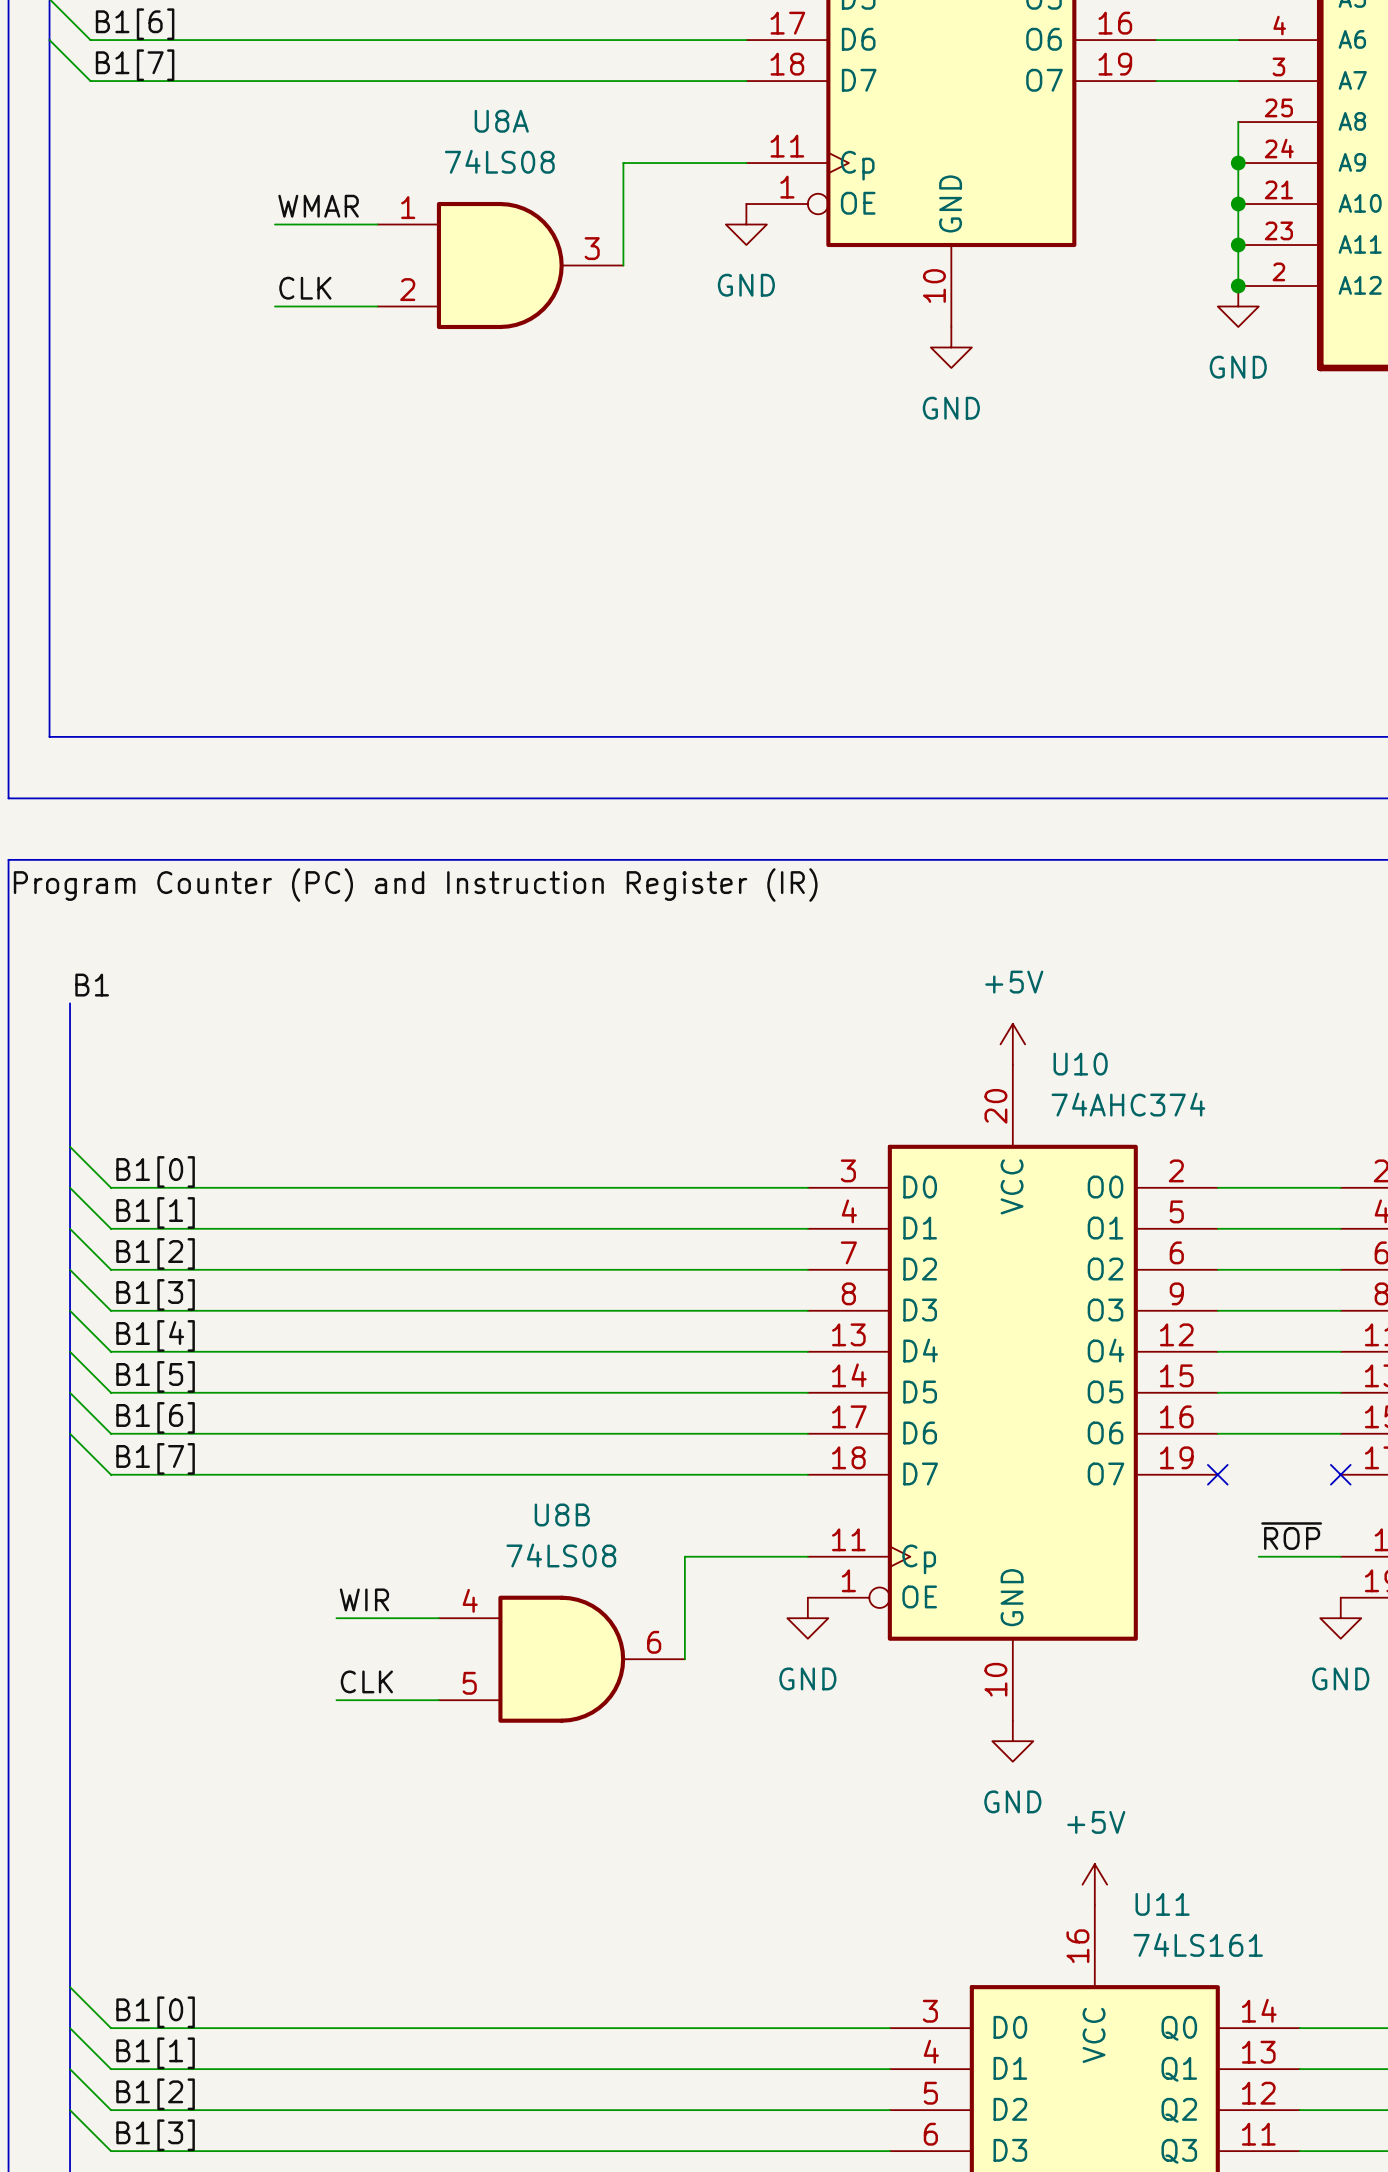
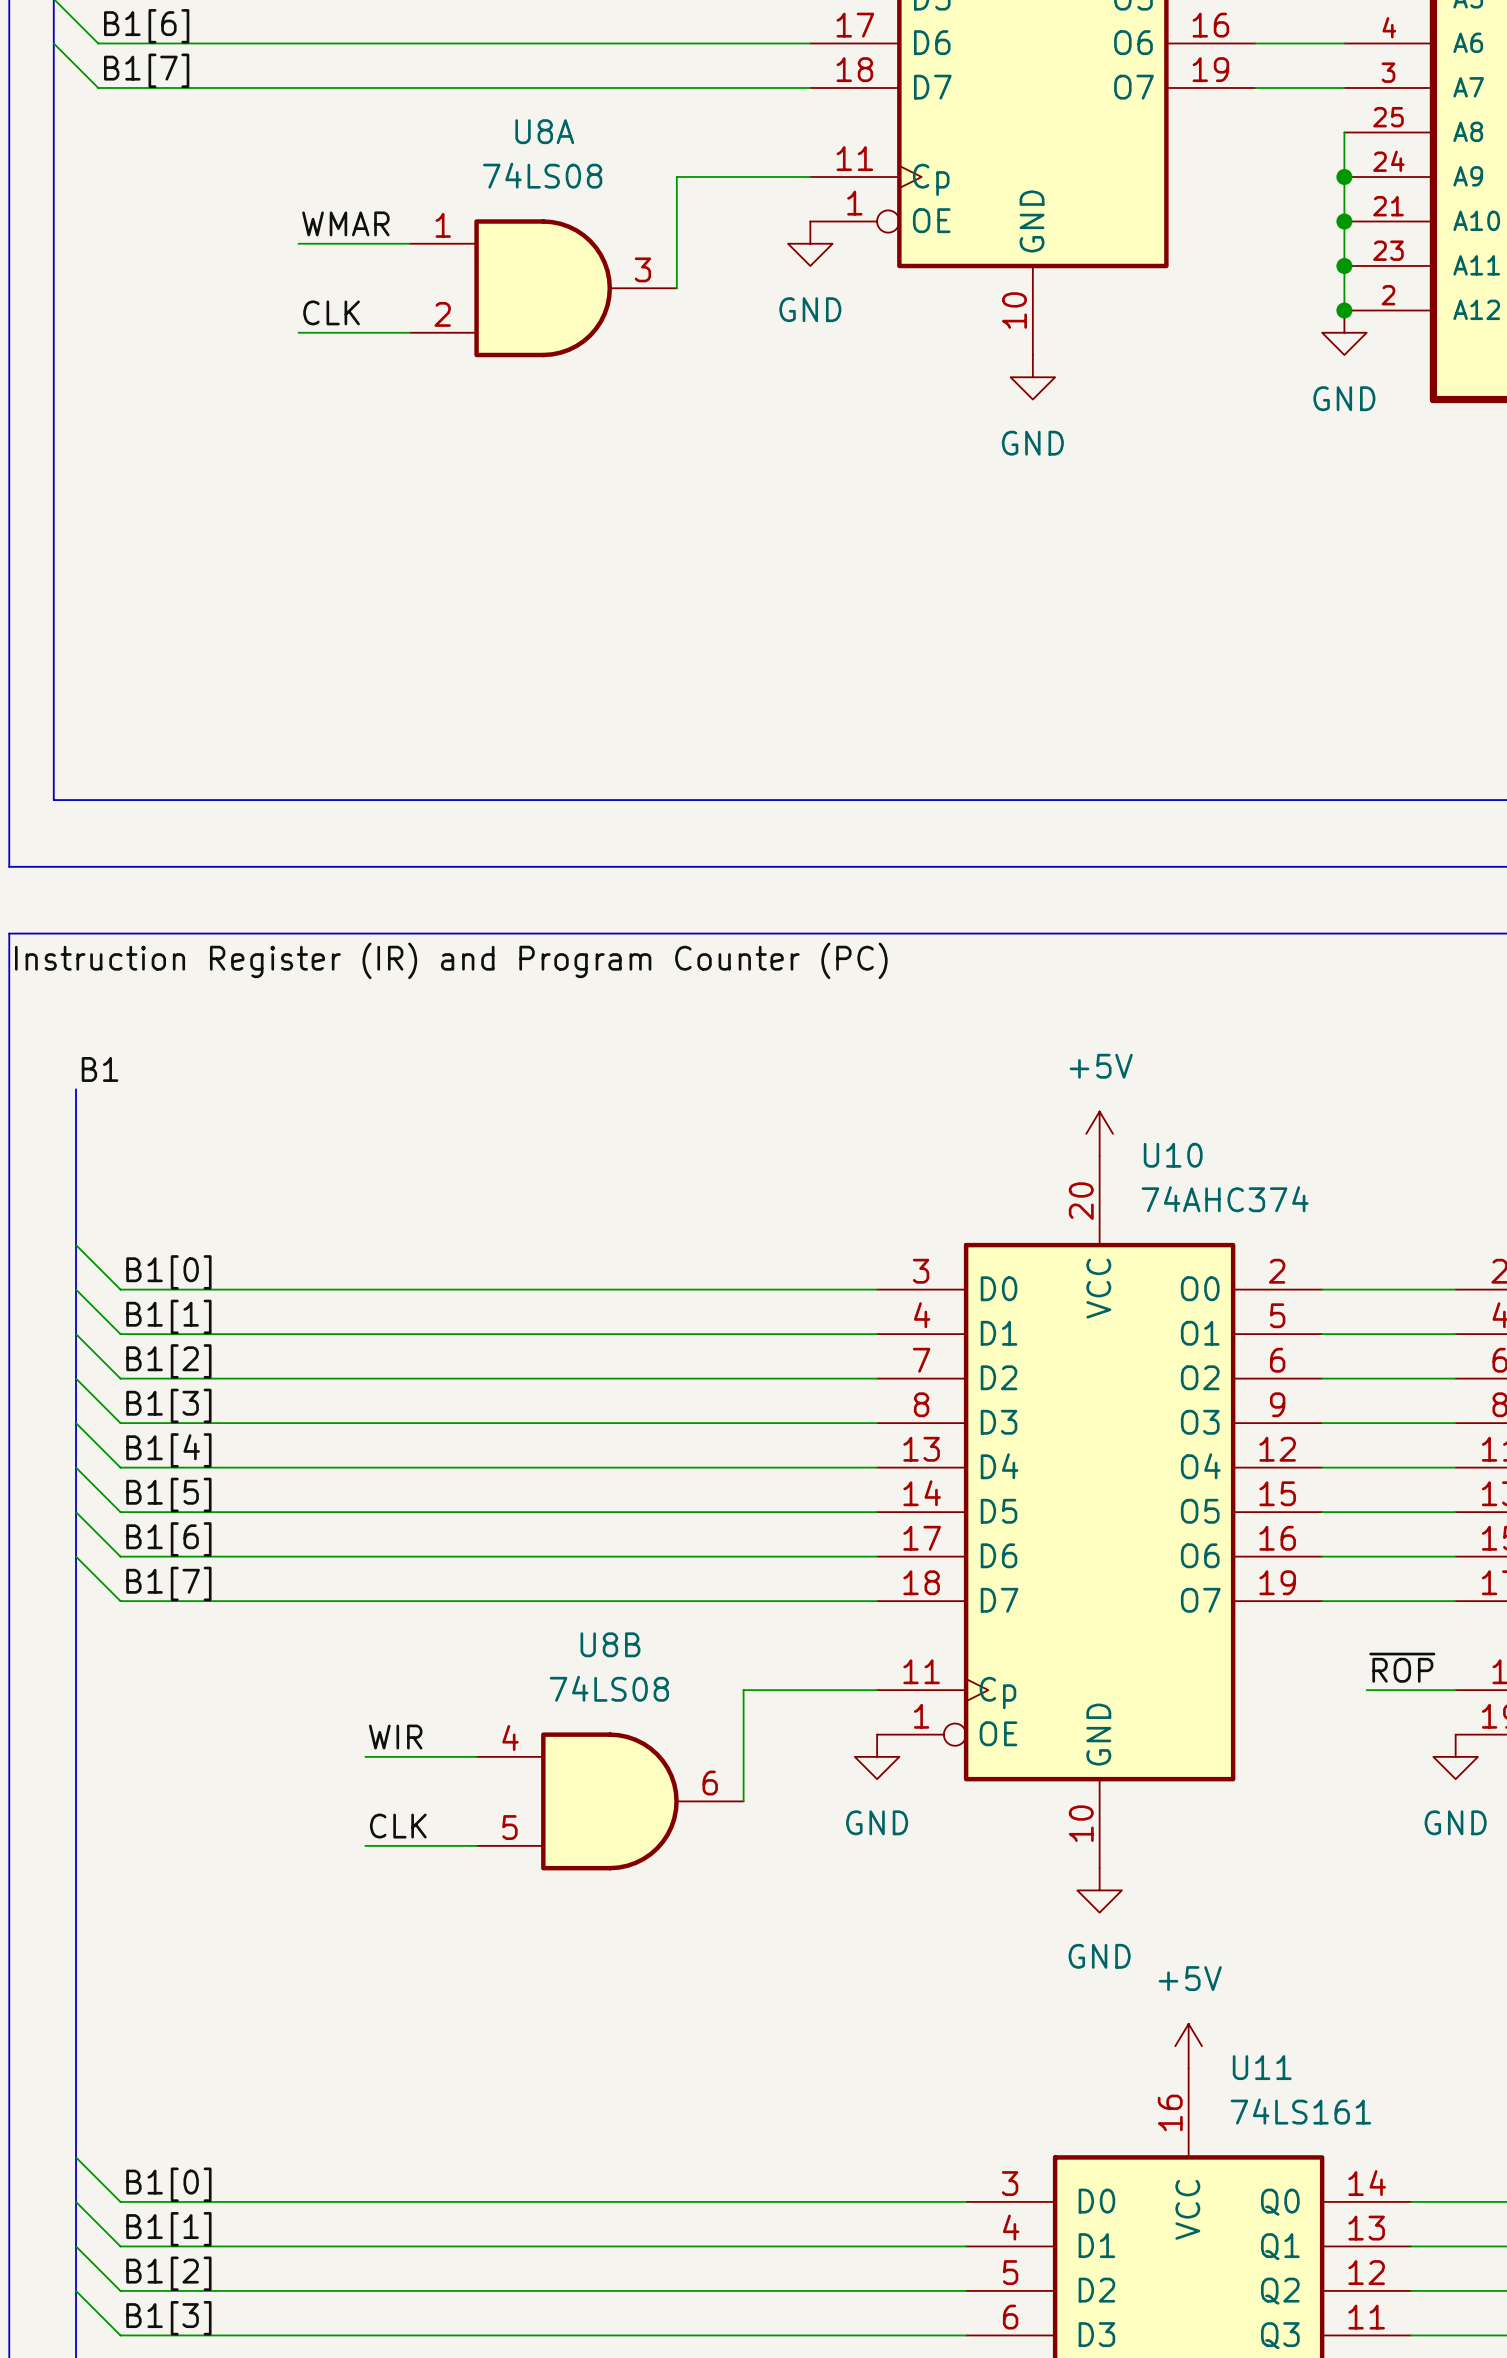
label: Program Counter (PC) and Instruction Register (IR) (415, 885) -> Instruction Register (IR) and Program Counter (PC) (451, 960)
wire: none -> (1322, 1601) (1455, 1601)
no-connect mark: (1217, 1474) -> none
no-connect mark: (1340, 1474) -> none

